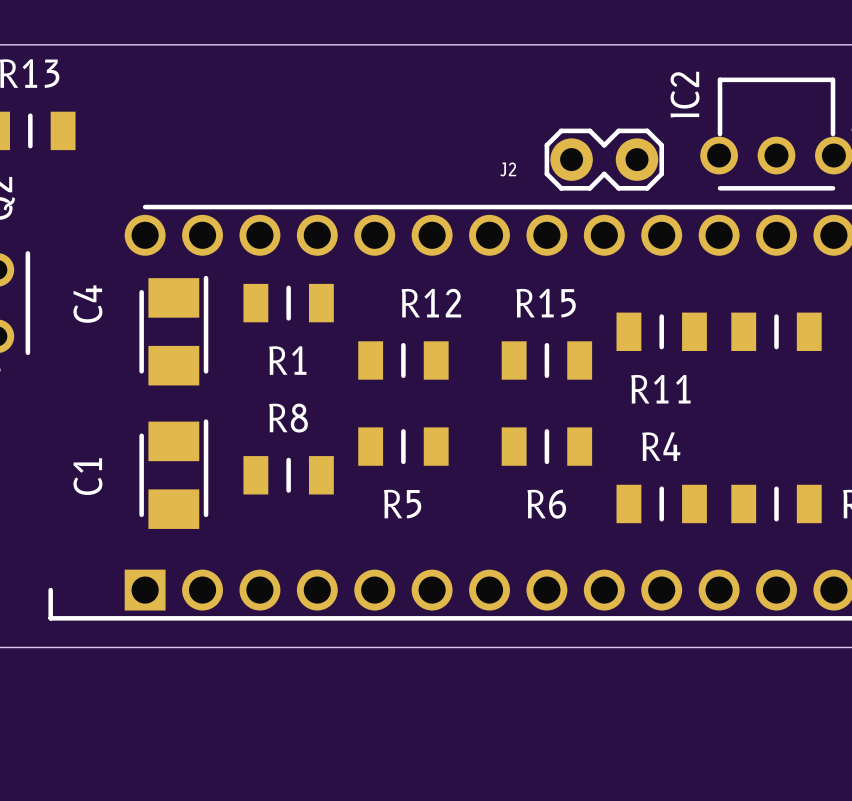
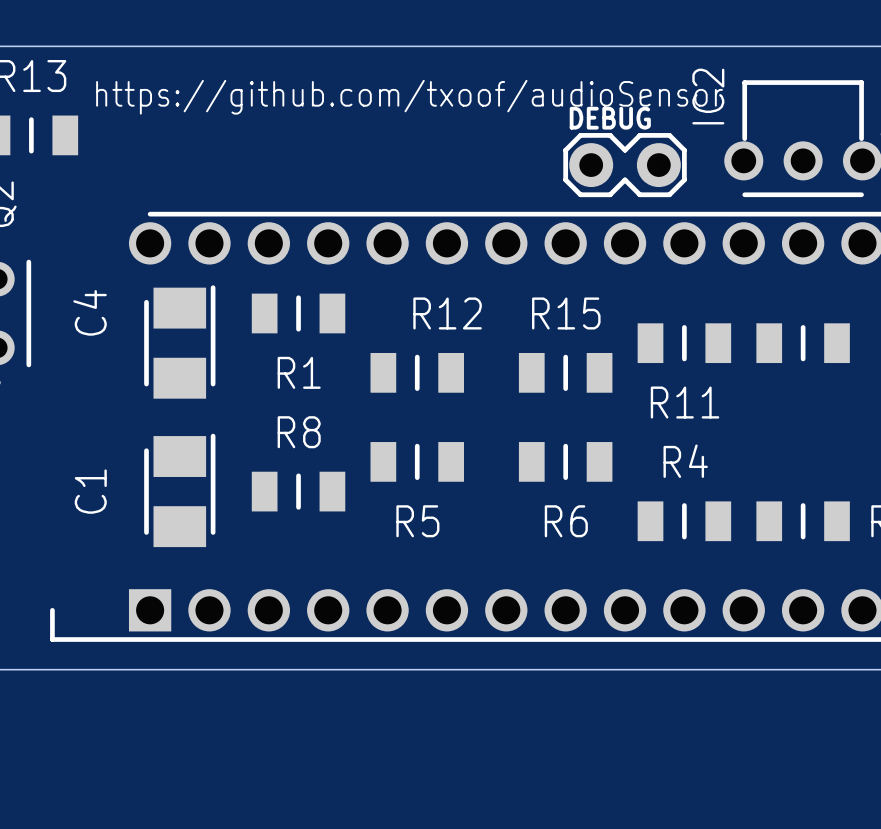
text: none -> https://github.com/txoof/audioSensor (409, 97)
J2 name: J2 (508, 169) -> DEBUG (610, 118)

